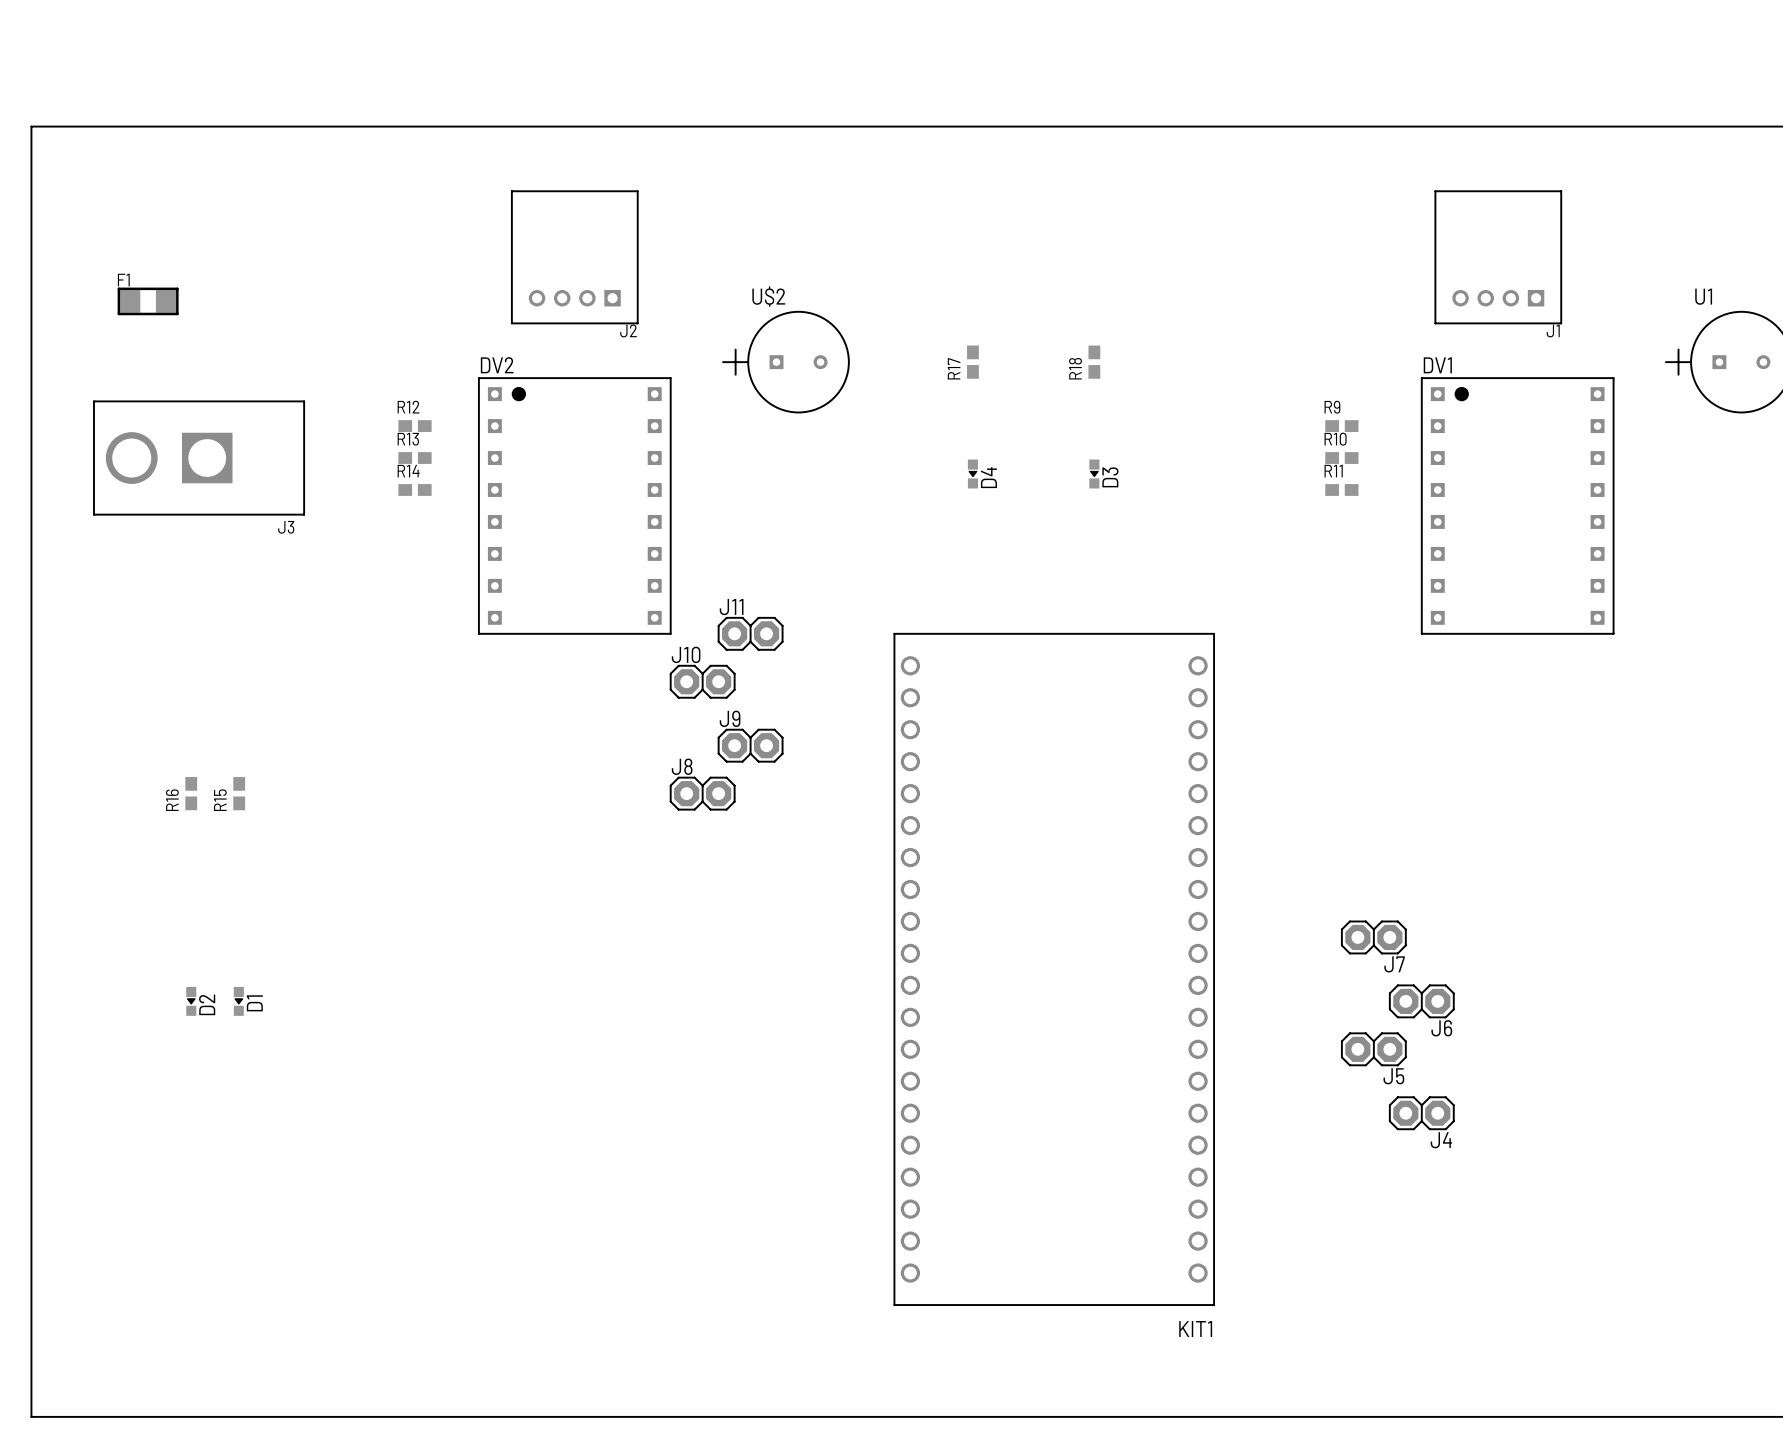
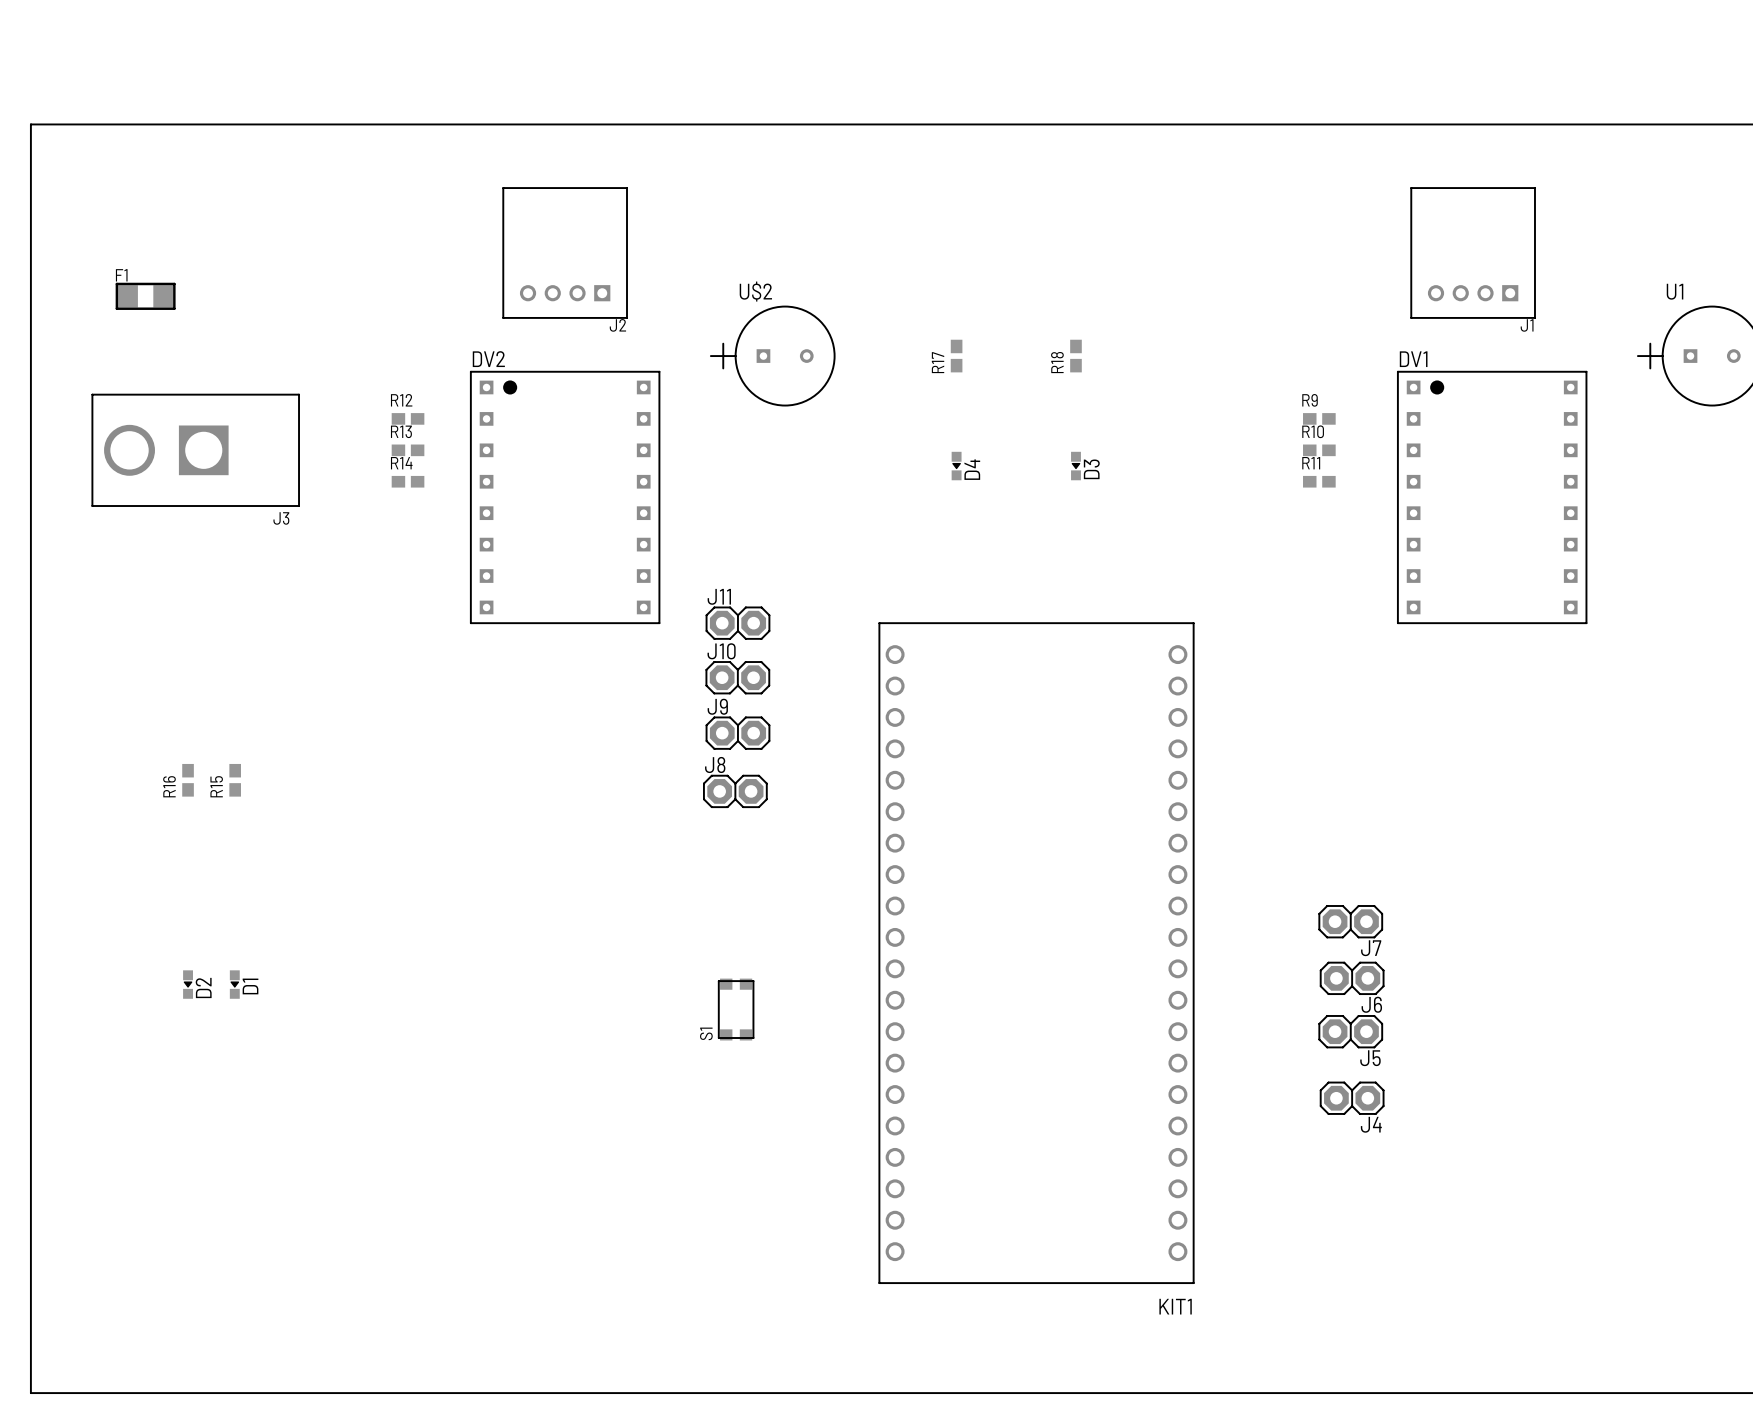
J10 position: (702, 681) -> (737, 677)
J8 position: (702, 793) -> (735, 791)
J6 position: (1421, 1001) -> (1352, 978)
S1: none -> (736, 1009)
J4 position: (1421, 1113) -> (1352, 1098)

